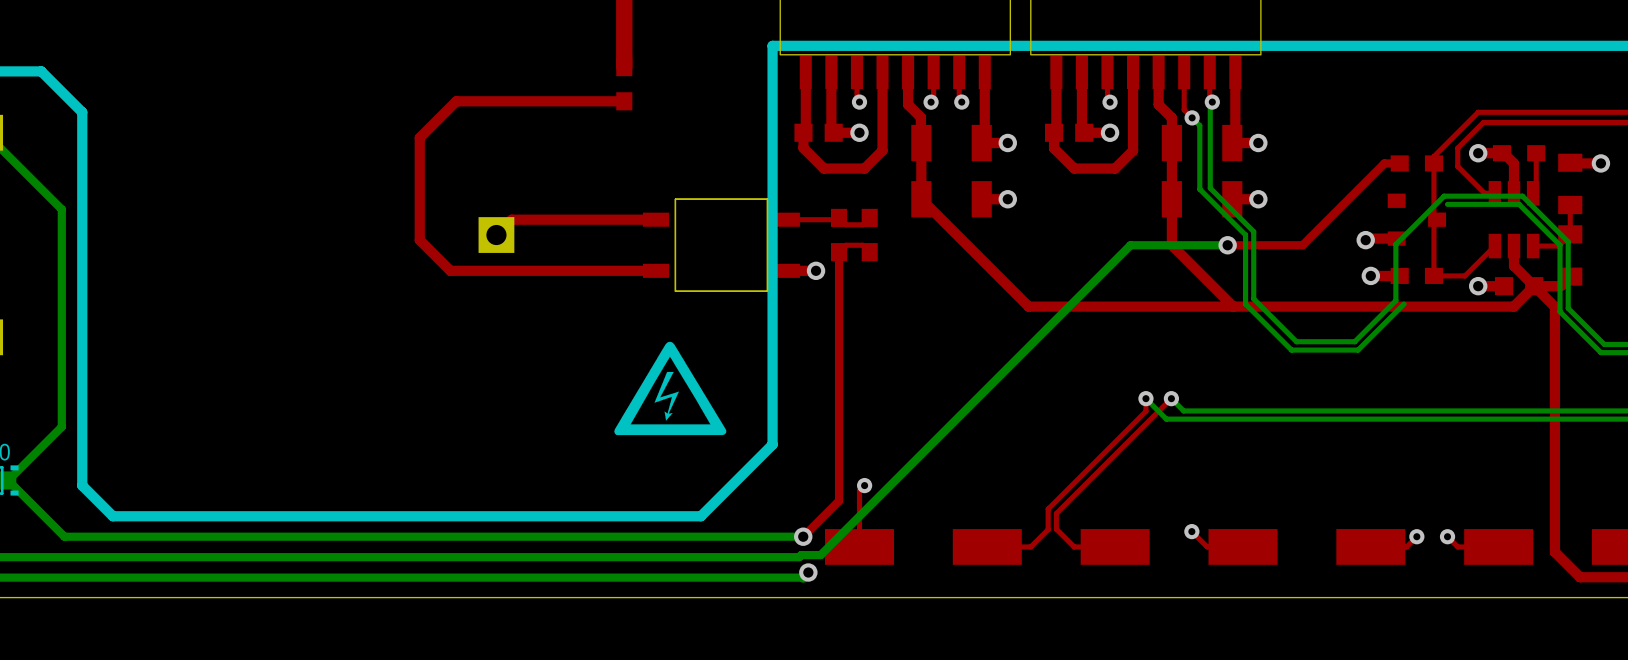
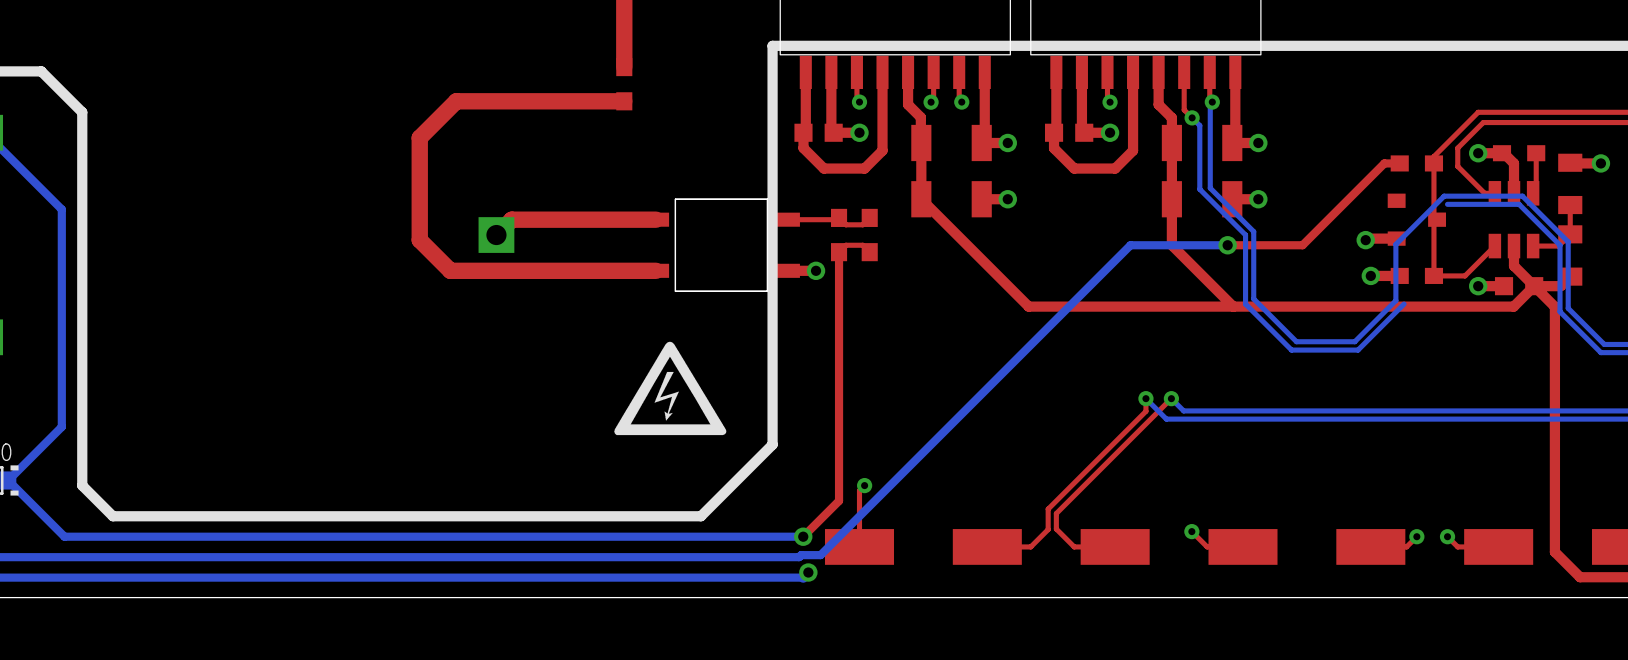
top track width: thin (624, 101) (456, 101) (419, 137) (419, 240) (450, 270) (656, 270) -> thick (624, 101) (456, 101) (419, 137) (419, 240) (450, 270) (656, 270)
top track width: thin (656, 219) (511, 219) (496, 235) -> thick (656, 219) (511, 219) (496, 235)

